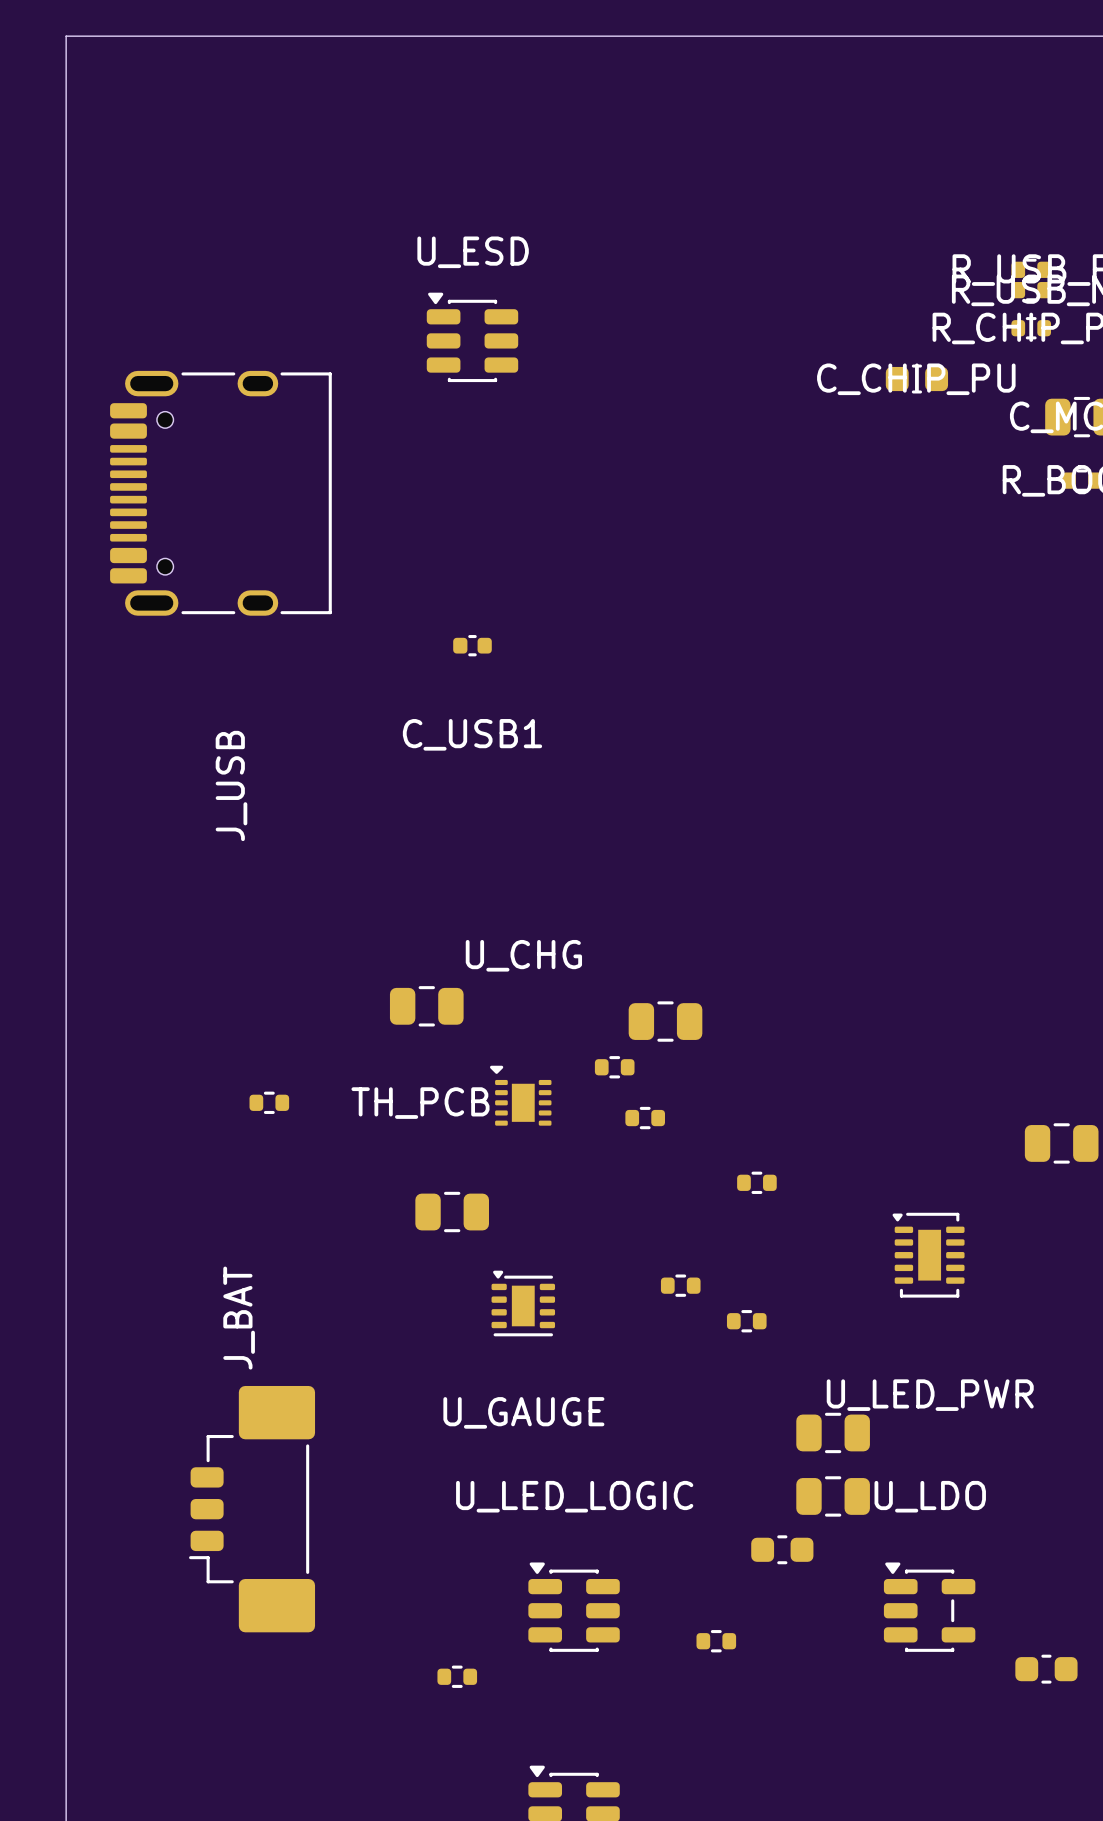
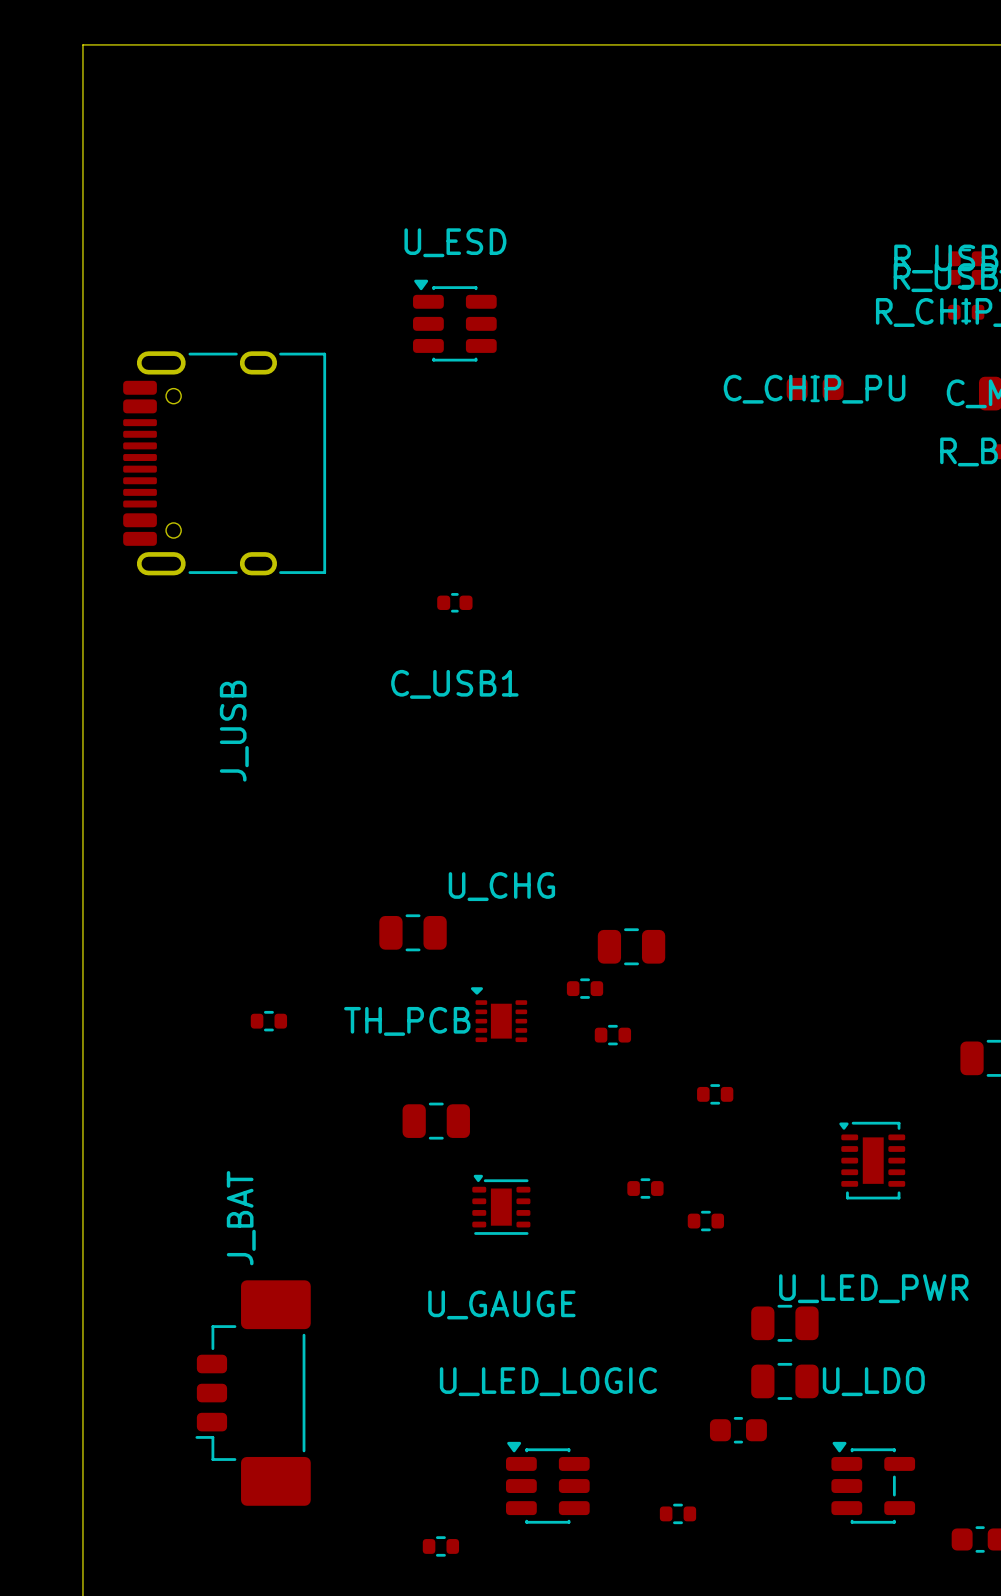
C_CHIP_PU position: (916, 379) -> (815, 388)

